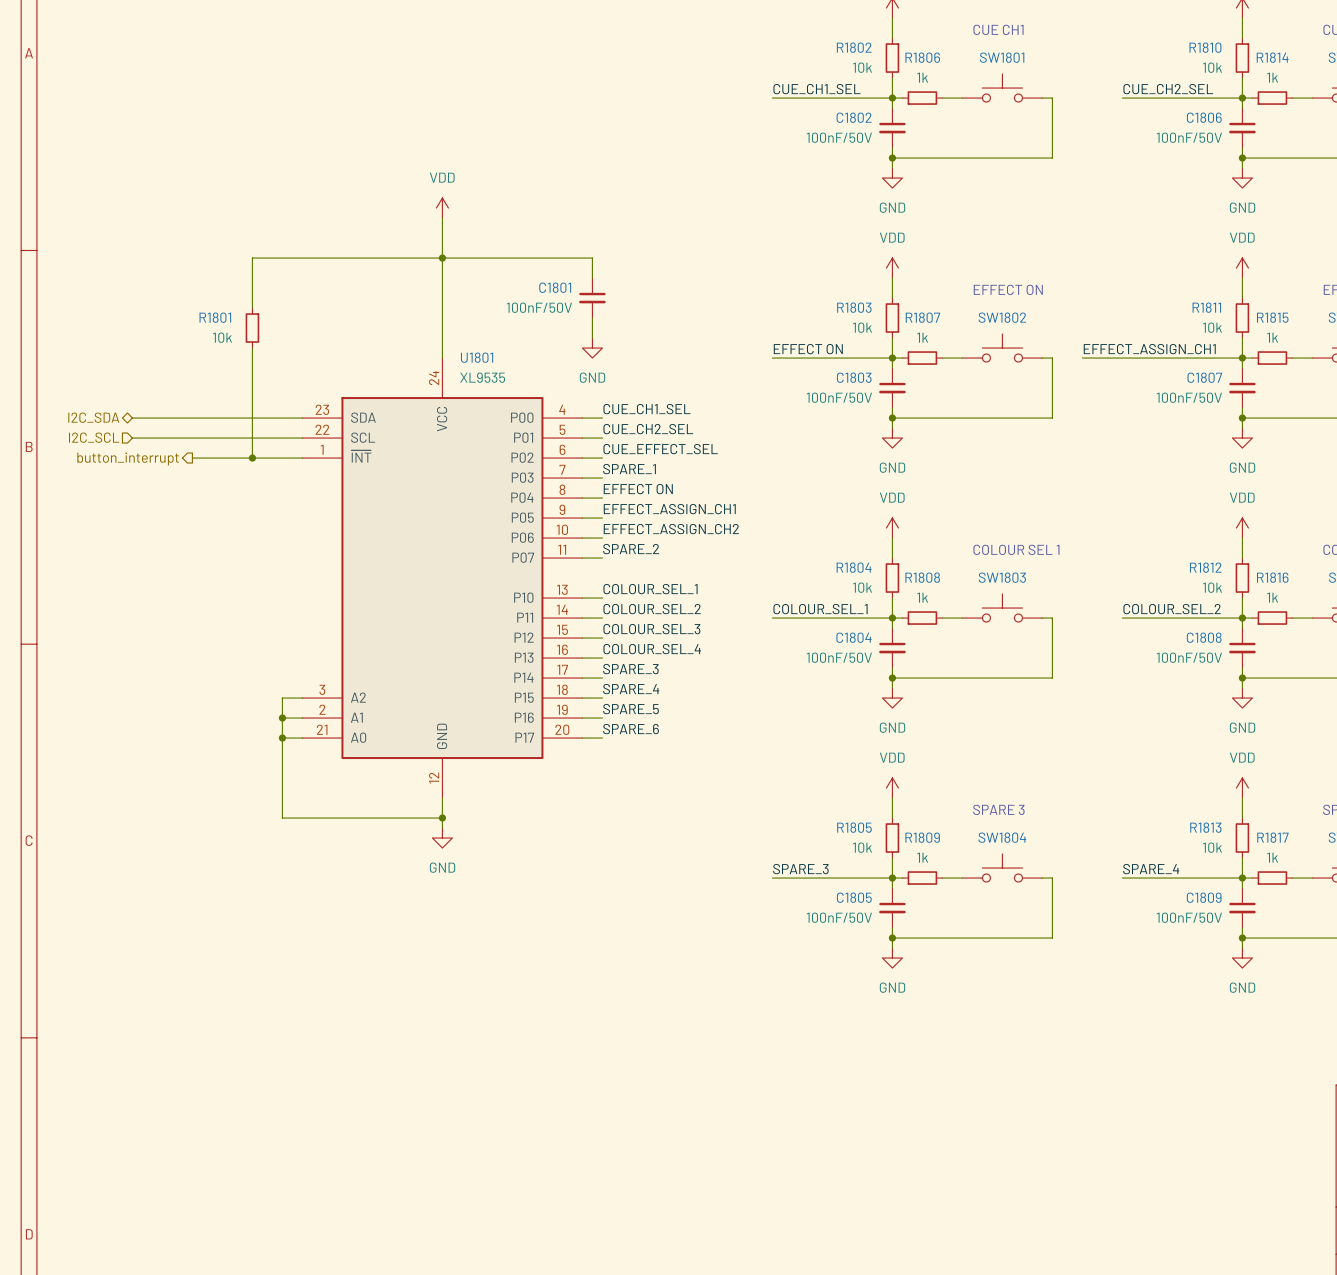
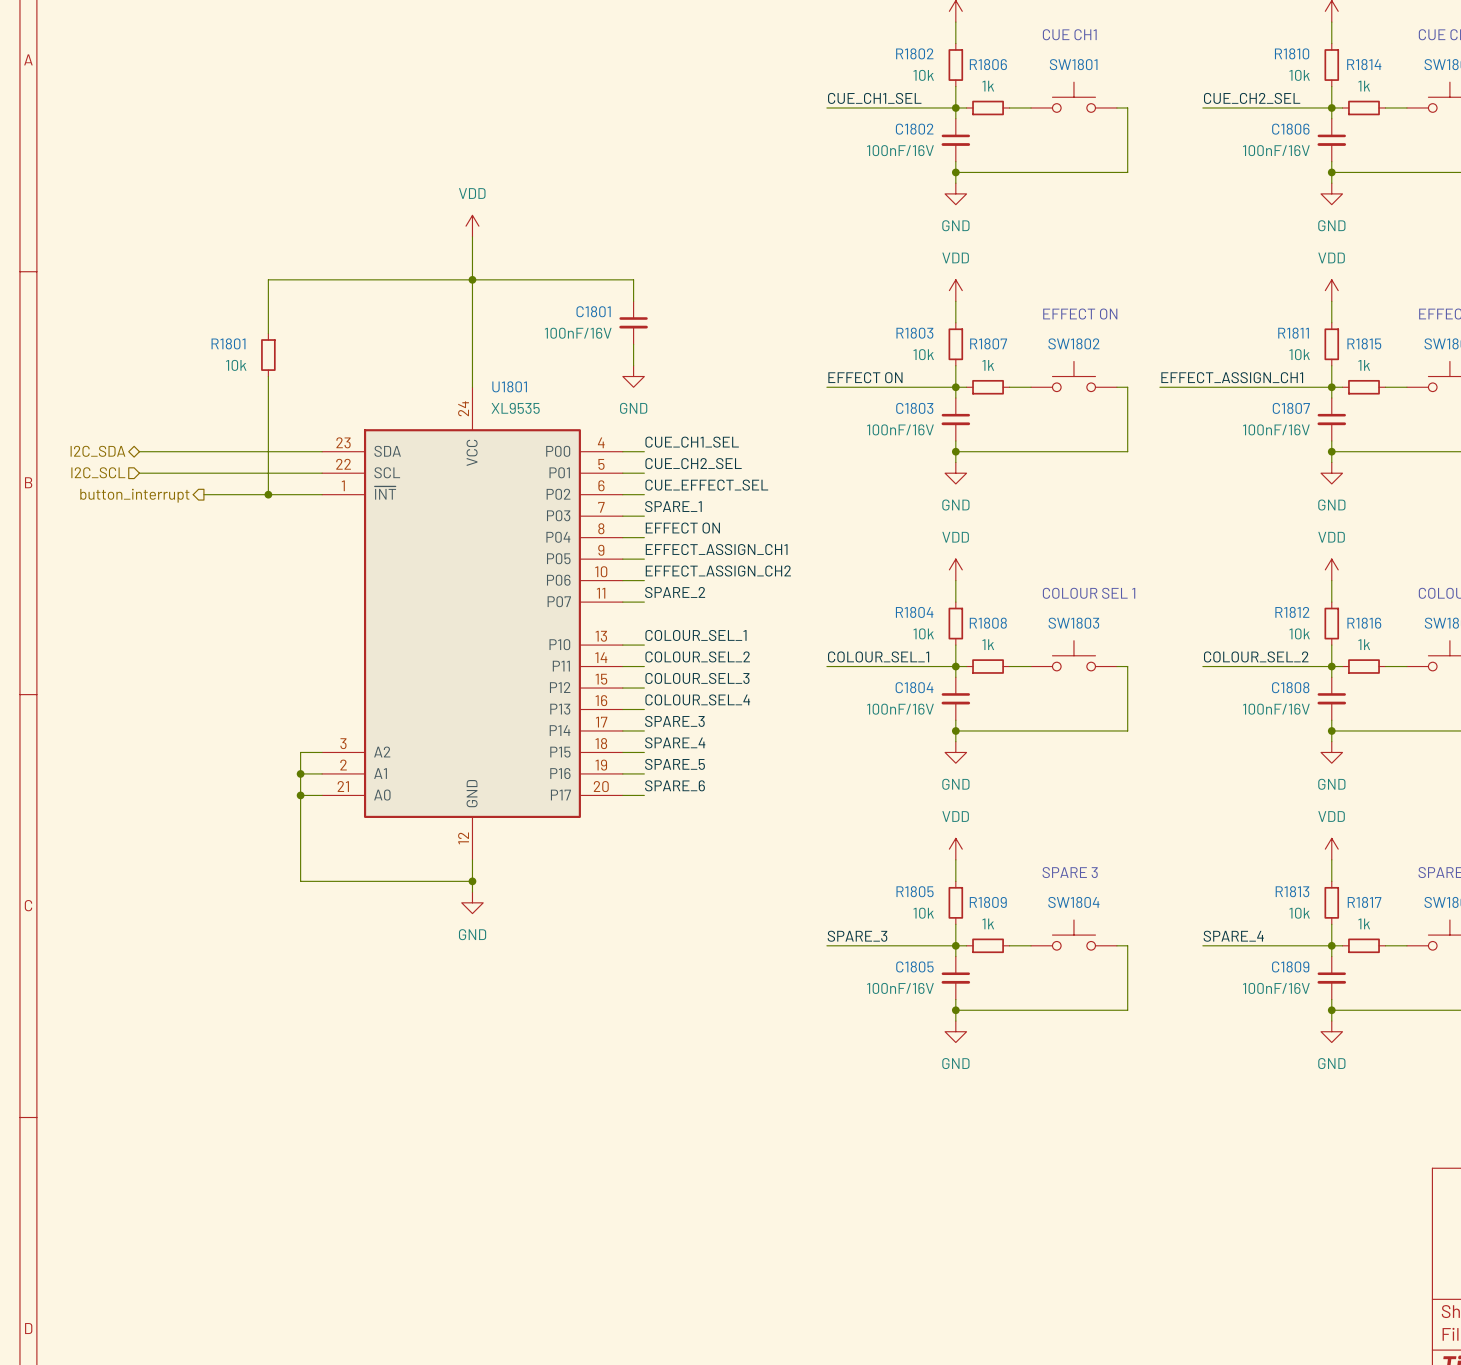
C1802 value: 100nF/50V (839, 137) -> 100nF/16V (900, 150)
C1806 value: 100nF/50V (1189, 137) -> 100nF/16V (1276, 150)
C1801 value: 100nF/50V (539, 307) -> 100nF/16V (578, 333)
C1803 value: 100nF/50V (839, 397) -> 100nF/16V (900, 429)
C1807 value: 100nF/50V (1189, 397) -> 100nF/16V (1276, 429)
C1804 value: 100nF/50V (839, 657) -> 100nF/16V (900, 709)
C1808 value: 100nF/50V (1189, 657) -> 100nF/16V (1276, 709)
C1805 value: 100nF/50V (839, 917) -> 100nF/16V (900, 988)
C1809 value: 100nF/50V (1189, 917) -> 100nF/16V (1276, 988)

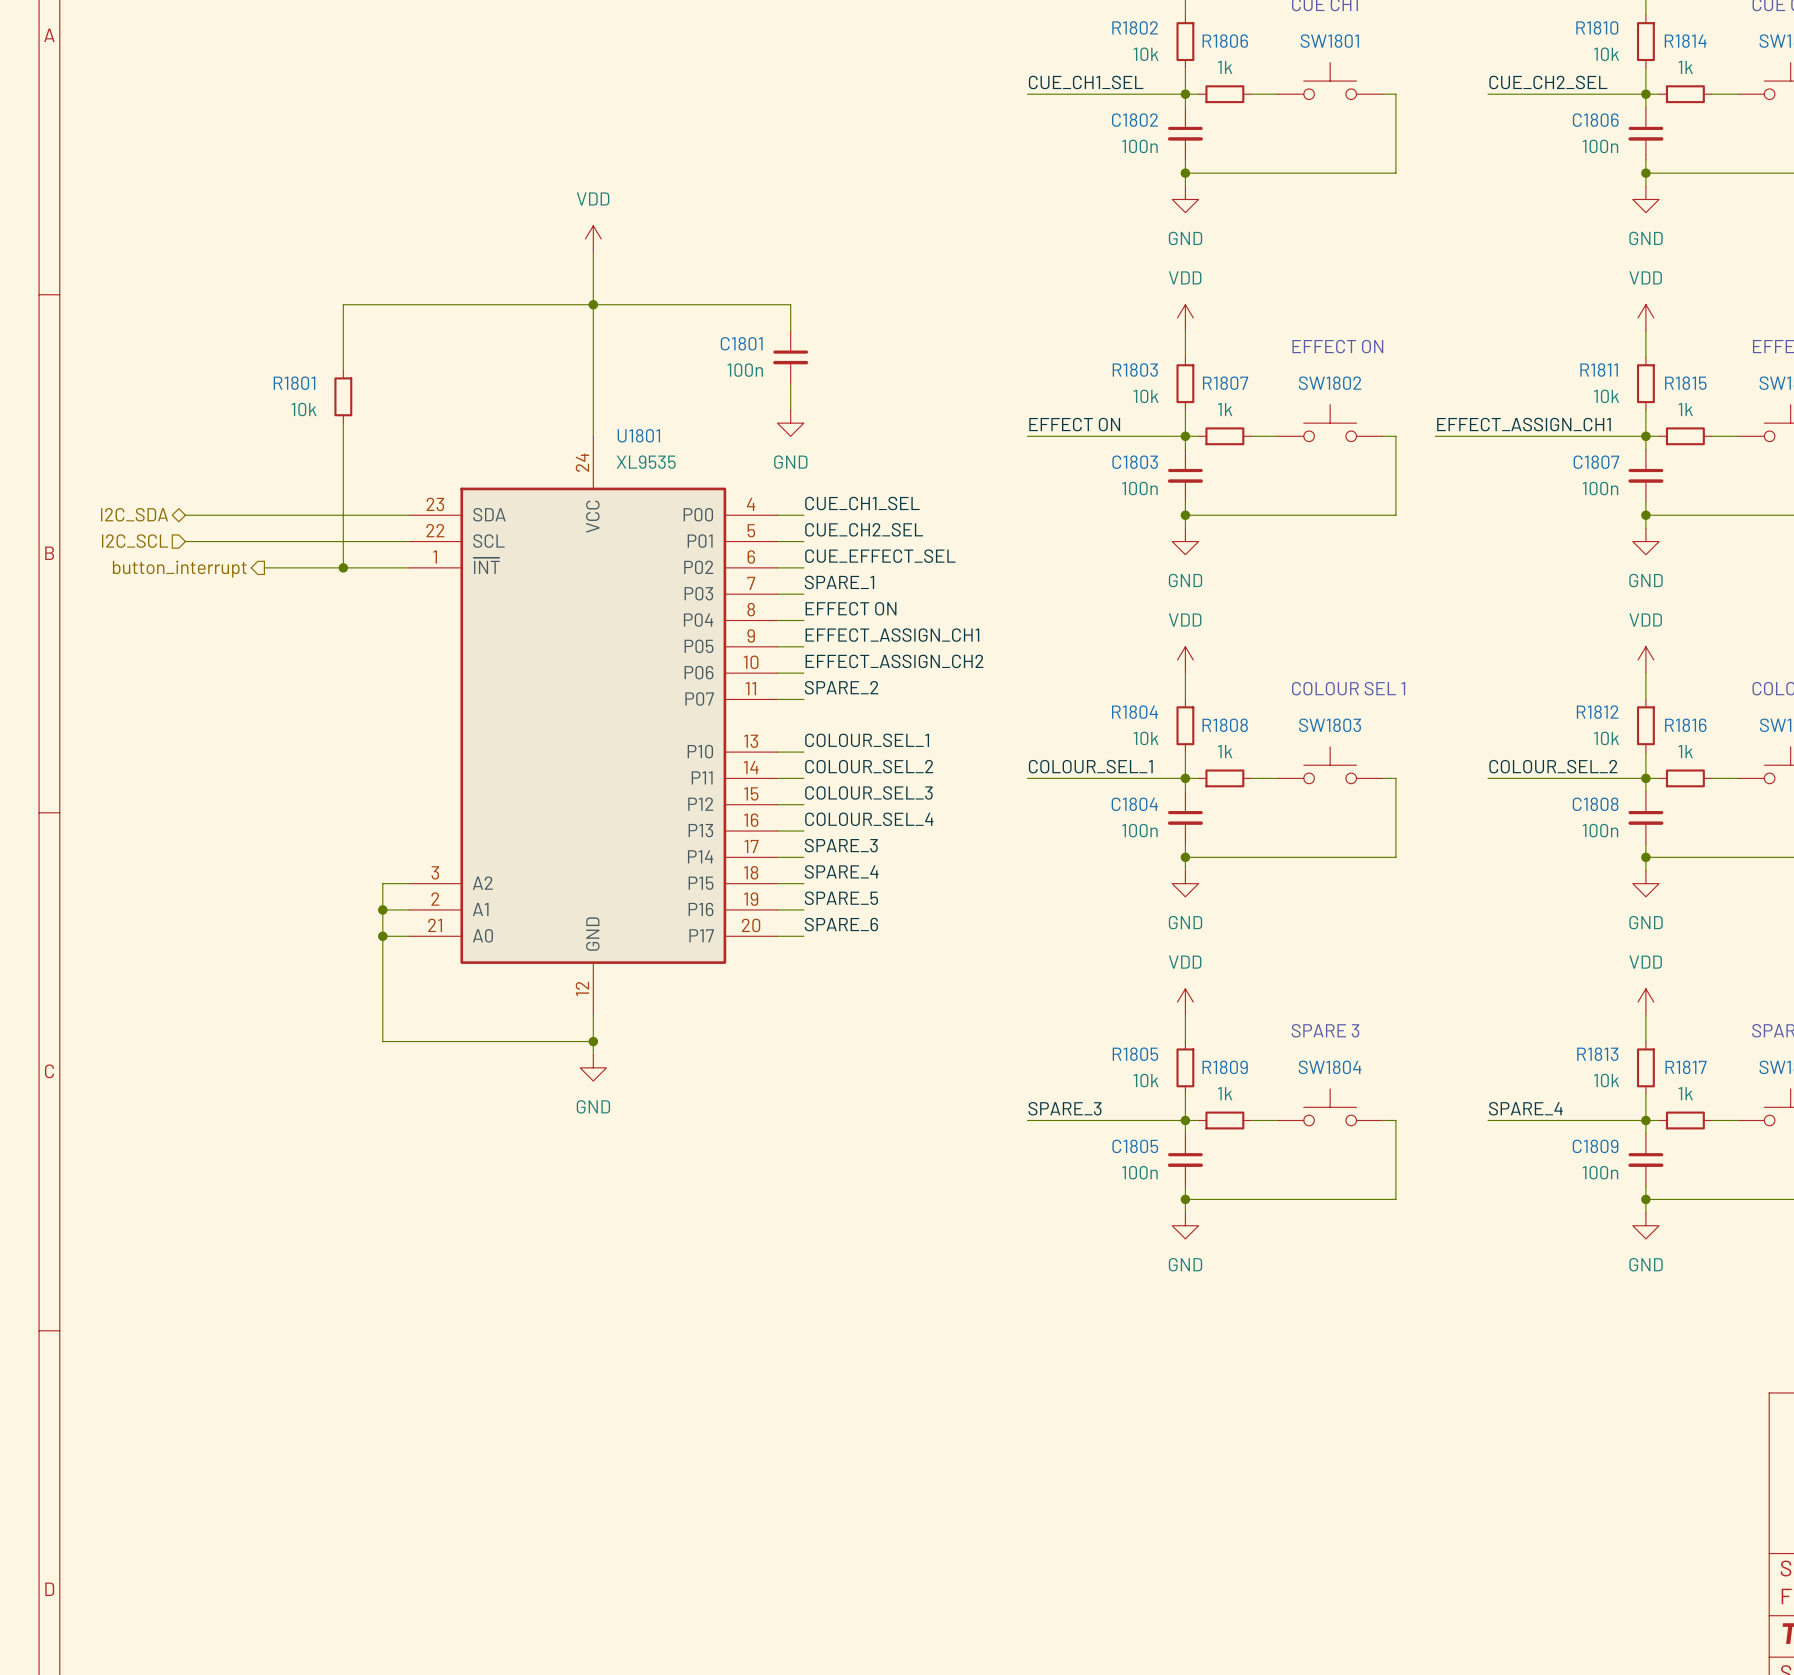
C1802 value: 100nF/16V (900, 150) -> 100n (1139, 146)
C1806 value: 100nF/16V (1276, 150) -> 100n (1600, 146)
C1801 value: 100nF/16V (578, 333) -> 100n (745, 370)
C1803 value: 100nF/16V (900, 429) -> 100n (1139, 488)
C1807 value: 100nF/16V (1276, 429) -> 100n (1600, 488)
C1804 value: 100nF/16V (900, 709) -> 100n (1139, 830)
C1808 value: 100nF/16V (1276, 709) -> 100n (1600, 830)
C1805 value: 100nF/16V (900, 988) -> 100n (1139, 1172)
C1809 value: 100nF/16V (1276, 988) -> 100n (1600, 1172)

